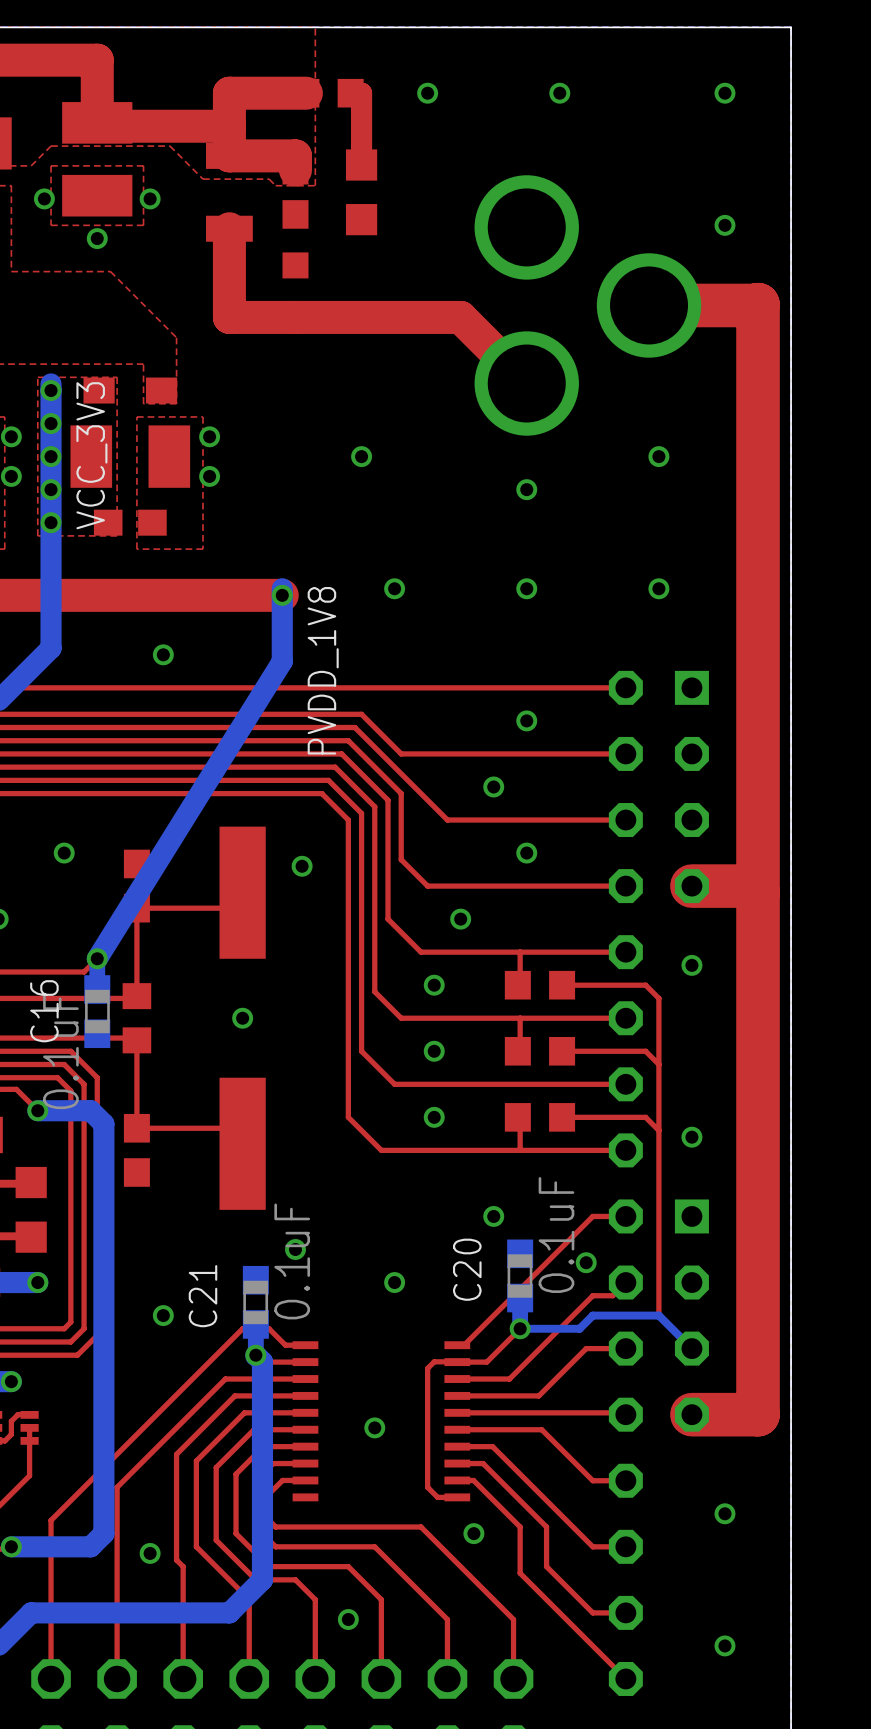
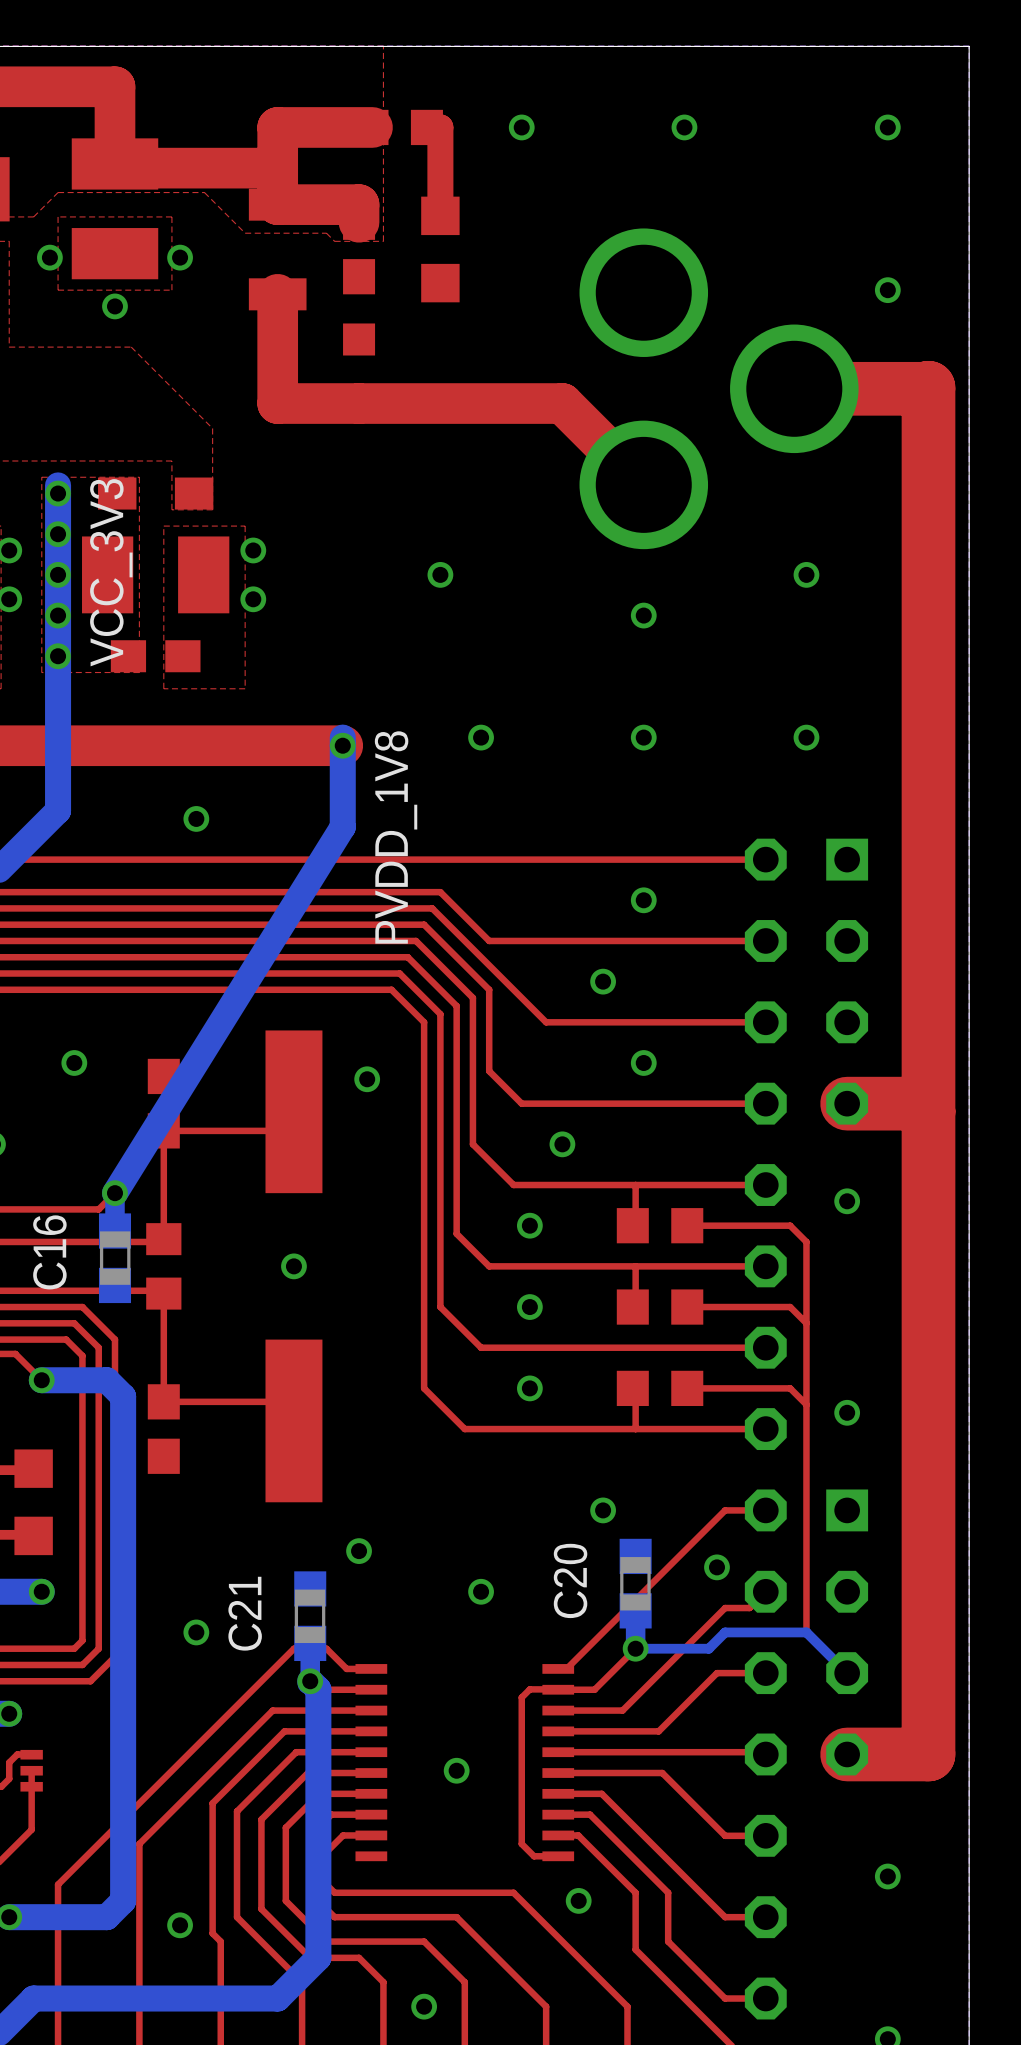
C16 value: 0.1uF (60, 1051) -> none
C20 value: 0.1uF (556, 1235) -> none
C21 value: 0.1uF (292, 1261) -> none

